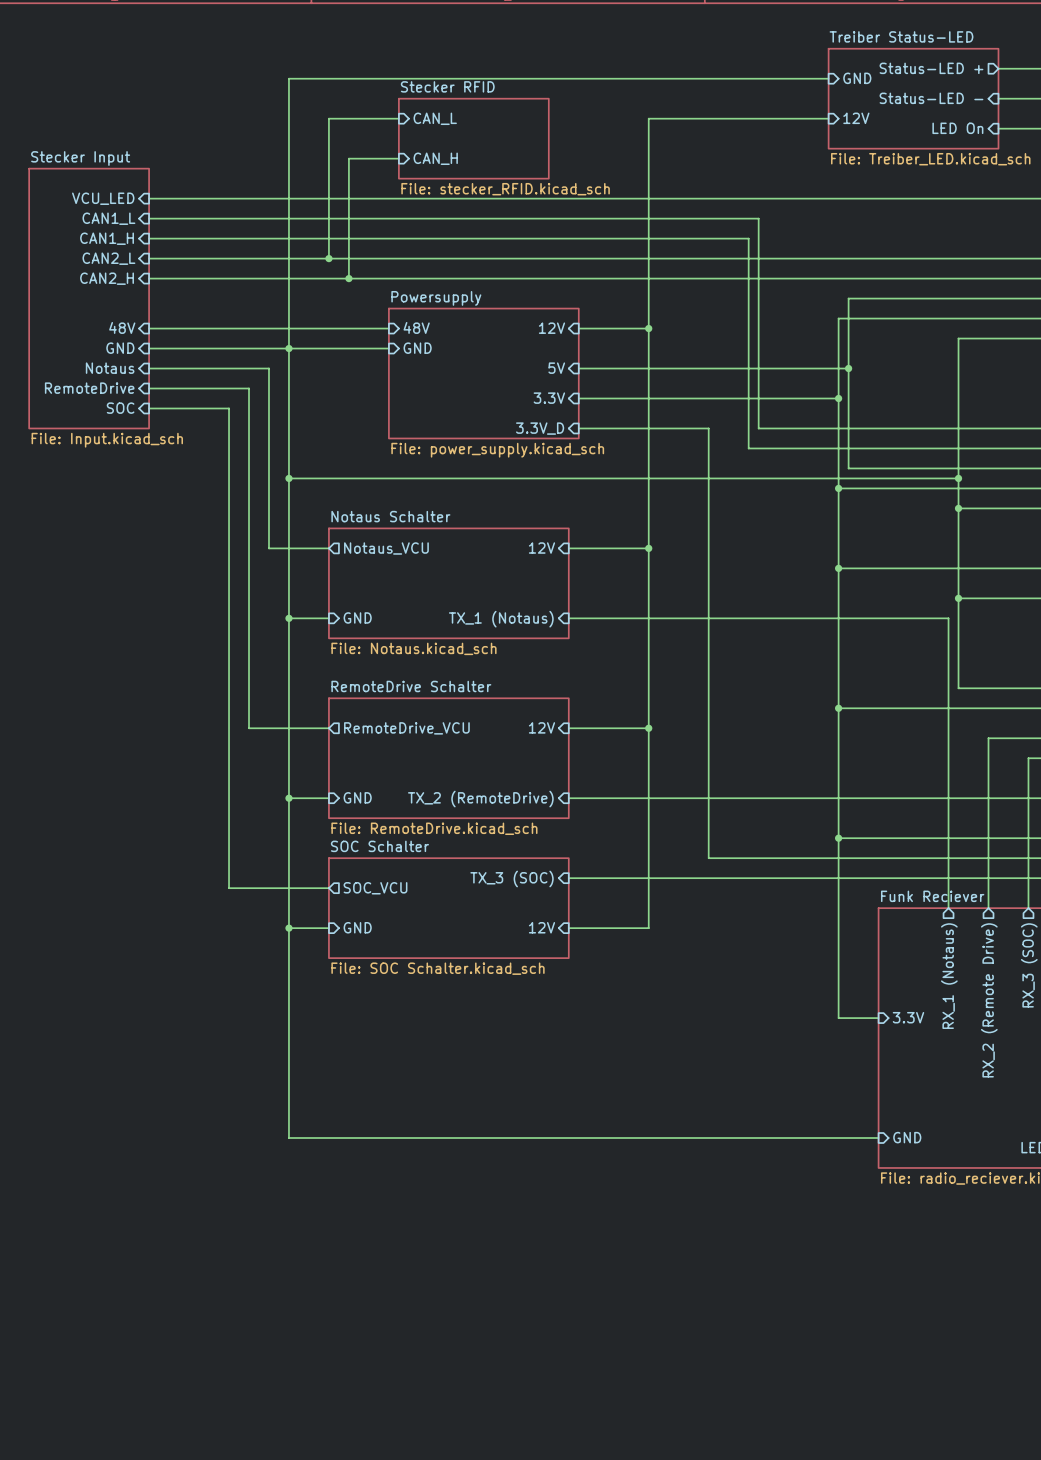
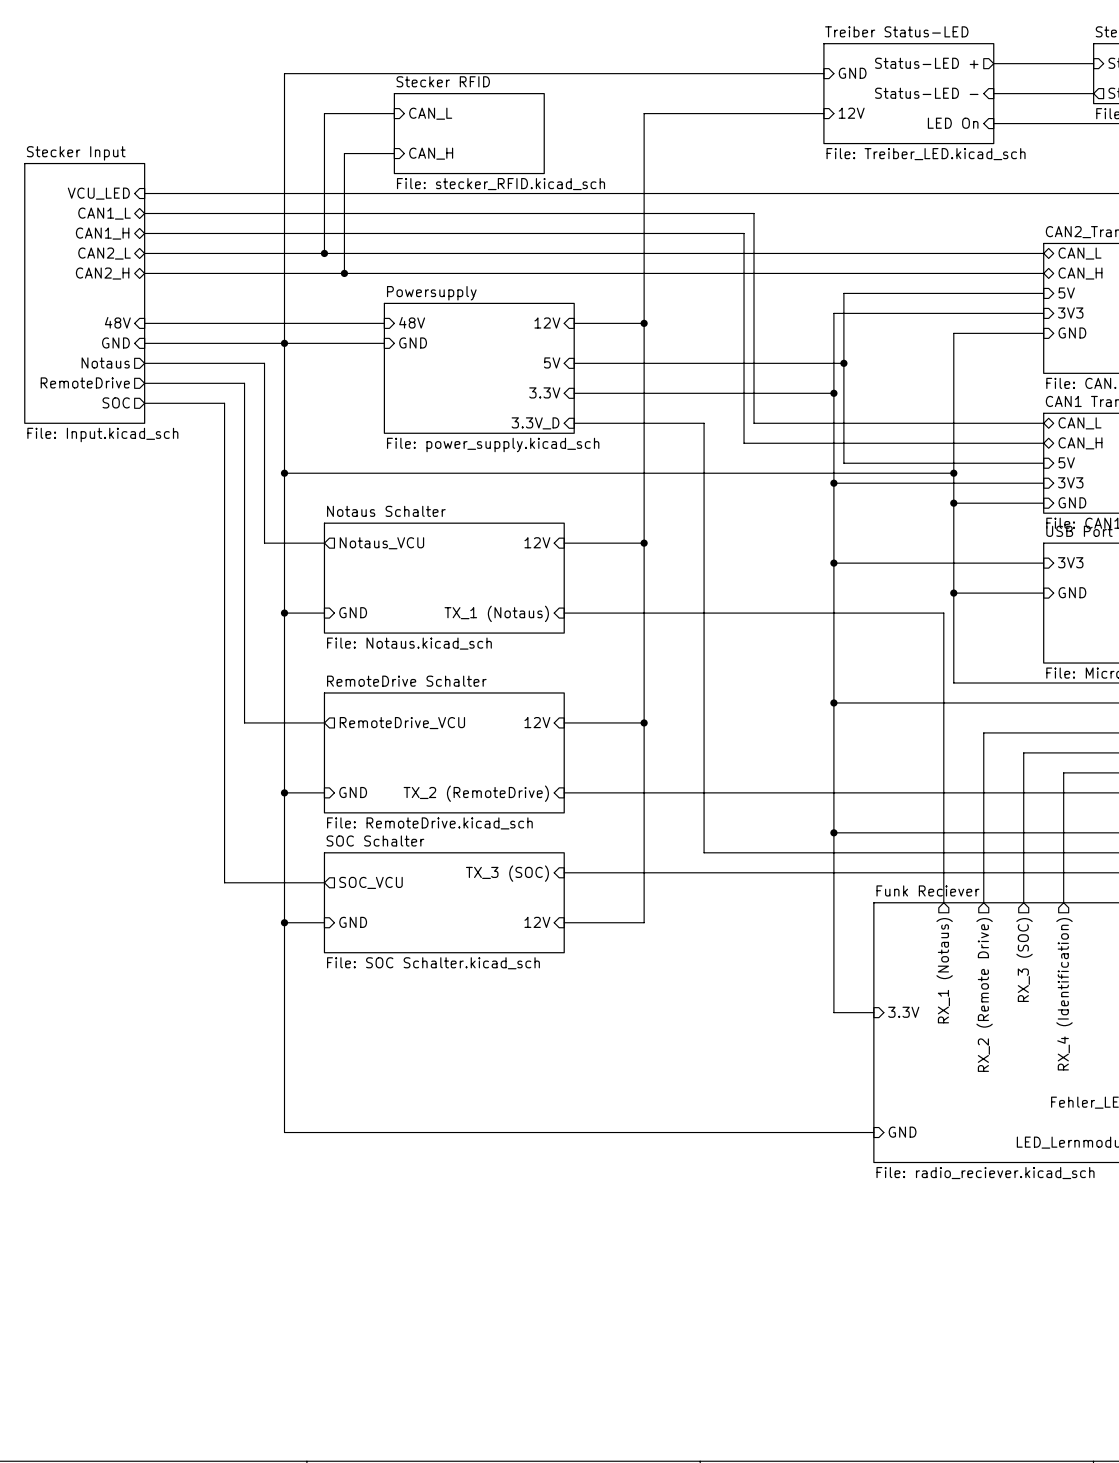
sheet pin shape: input (108, 218) -> bidirectional (104, 213)
sheet pin shape: input (107, 238) -> bidirectional (102, 233)
sheet pin shape: input (108, 258) -> bidirectional (104, 253)
sheet pin shape: input (107, 278) -> bidirectional (102, 273)
sheet pin shape: input (110, 368) -> output (105, 362)
sheet pin shape: input (89, 388) -> output (85, 382)
sheet pin shape: input (120, 408) -> output (116, 402)

